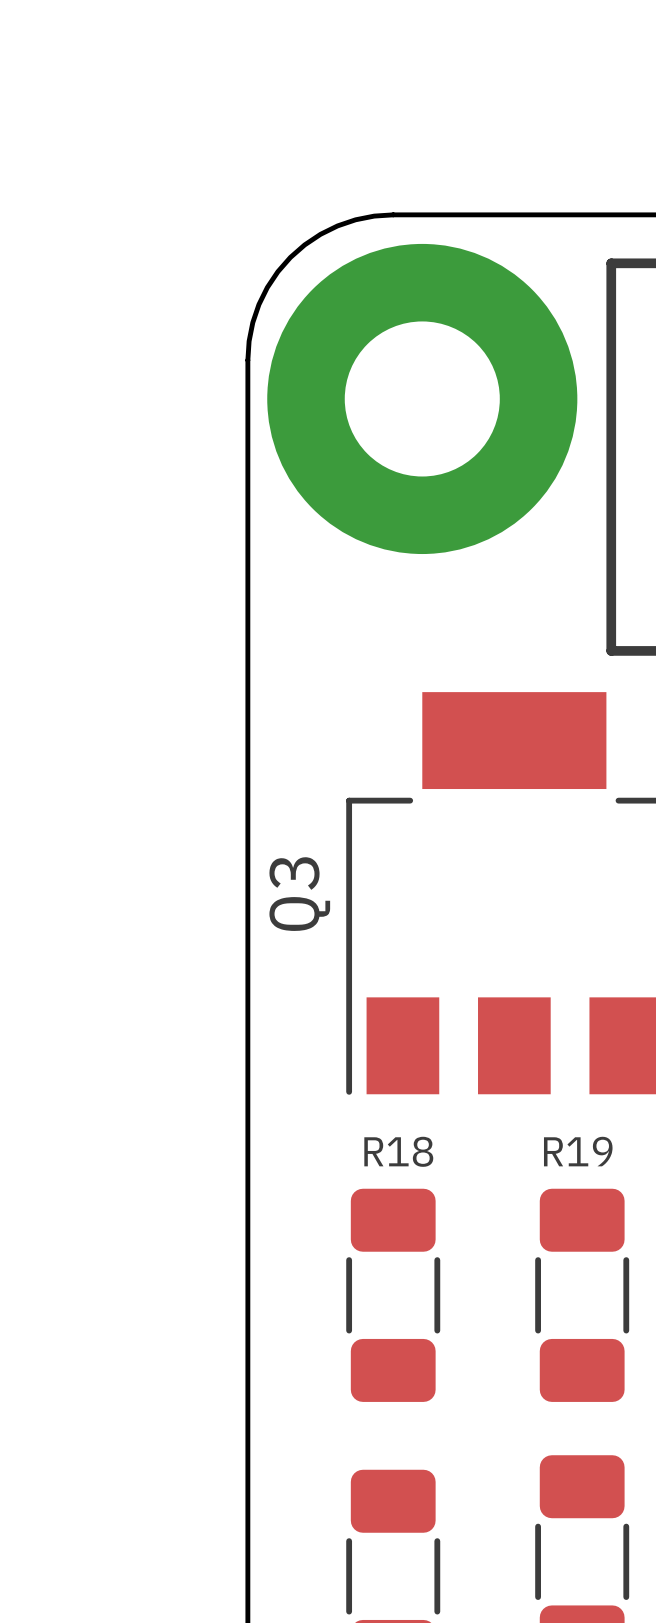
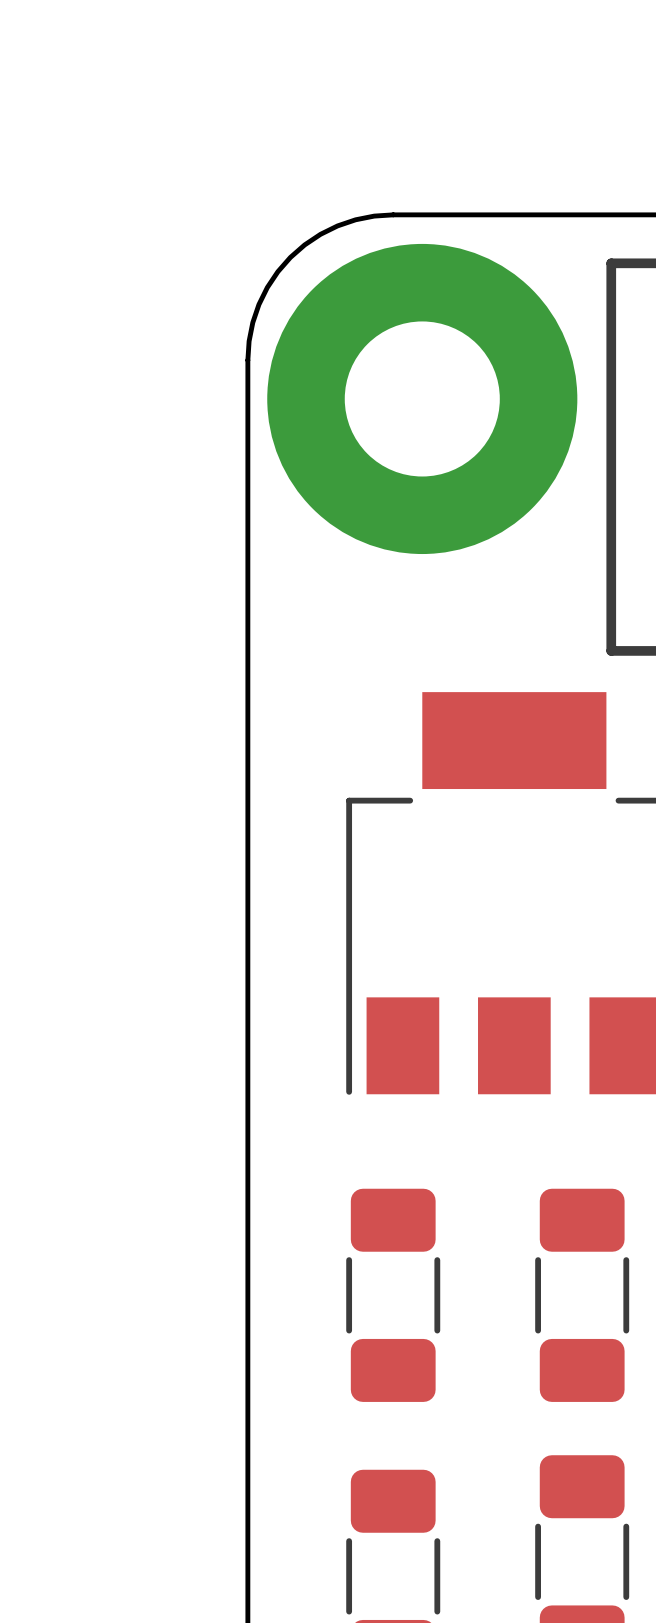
Q3 name: Q3 (299, 894) -> none
R18 name: R18 (398, 1151) -> none
R19 name: R19 (578, 1151) -> none

